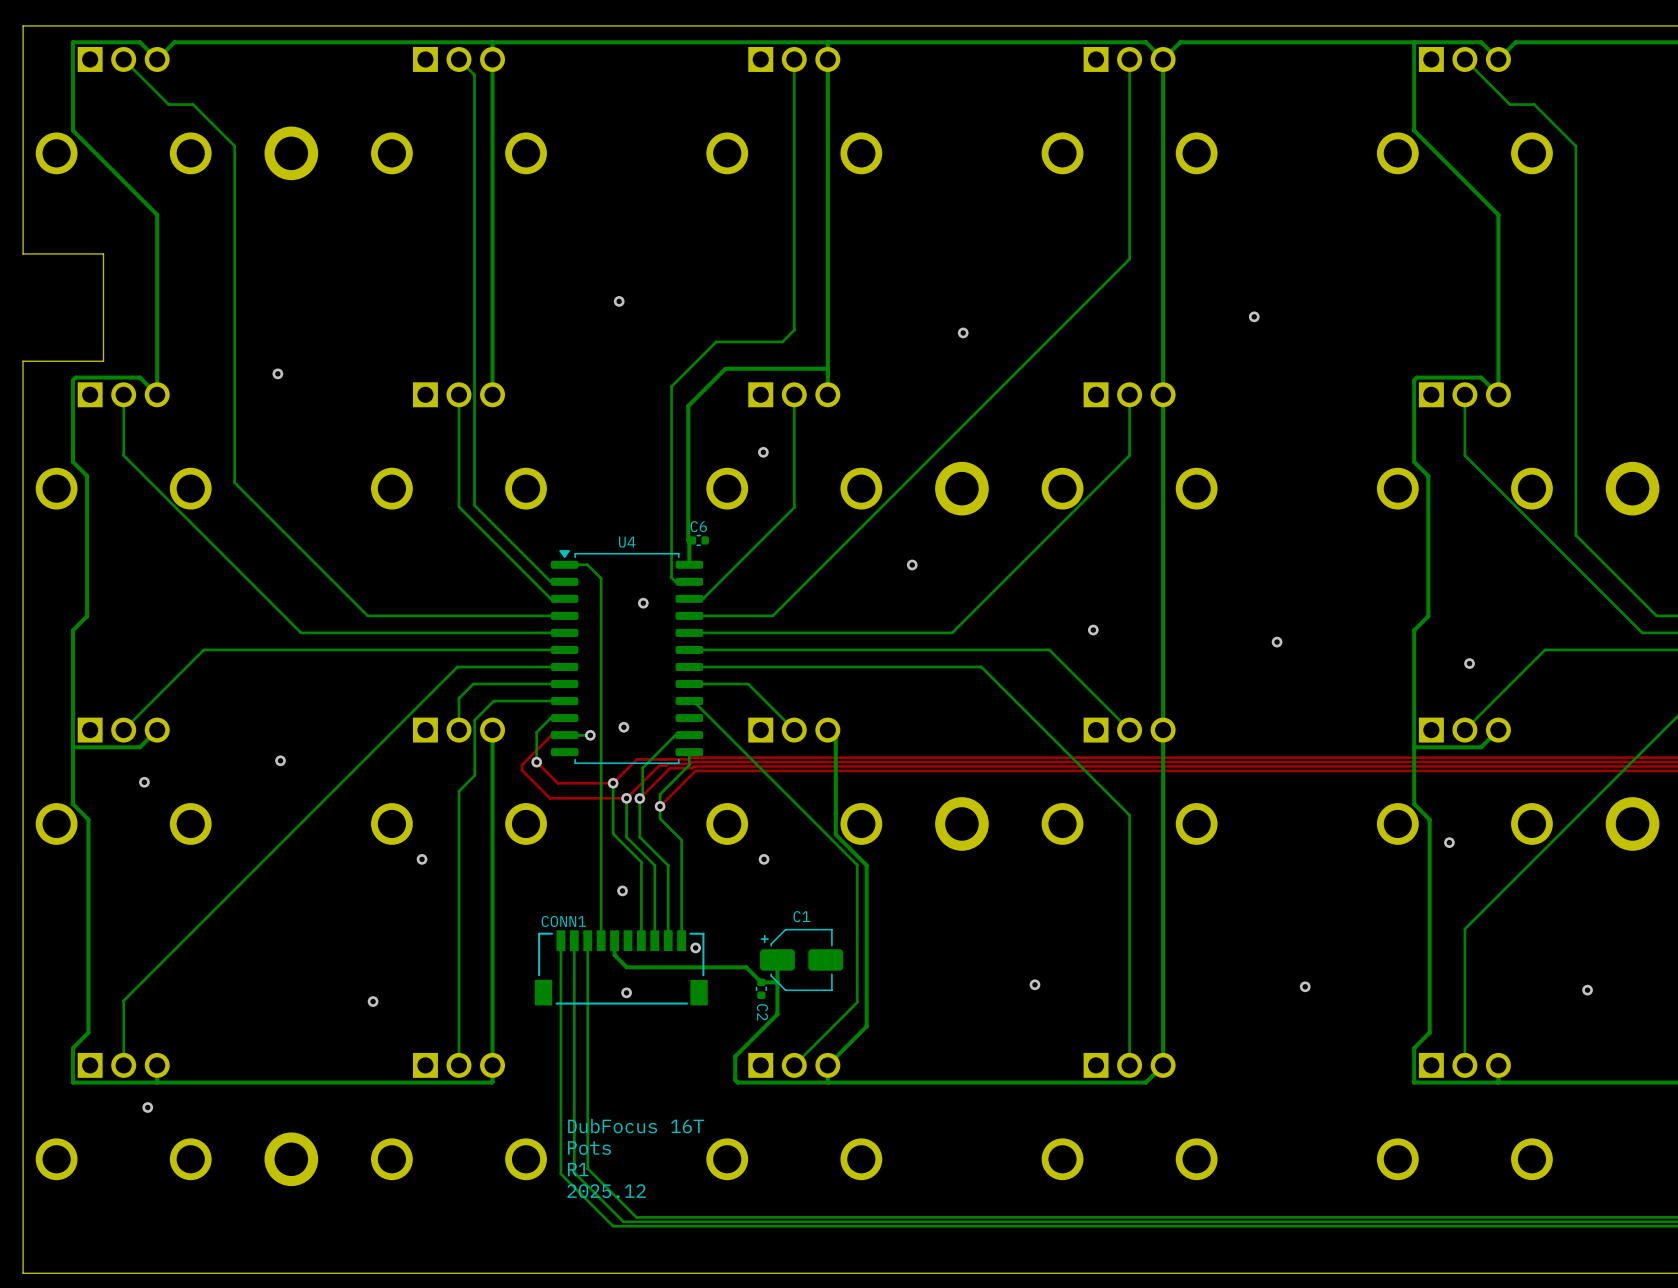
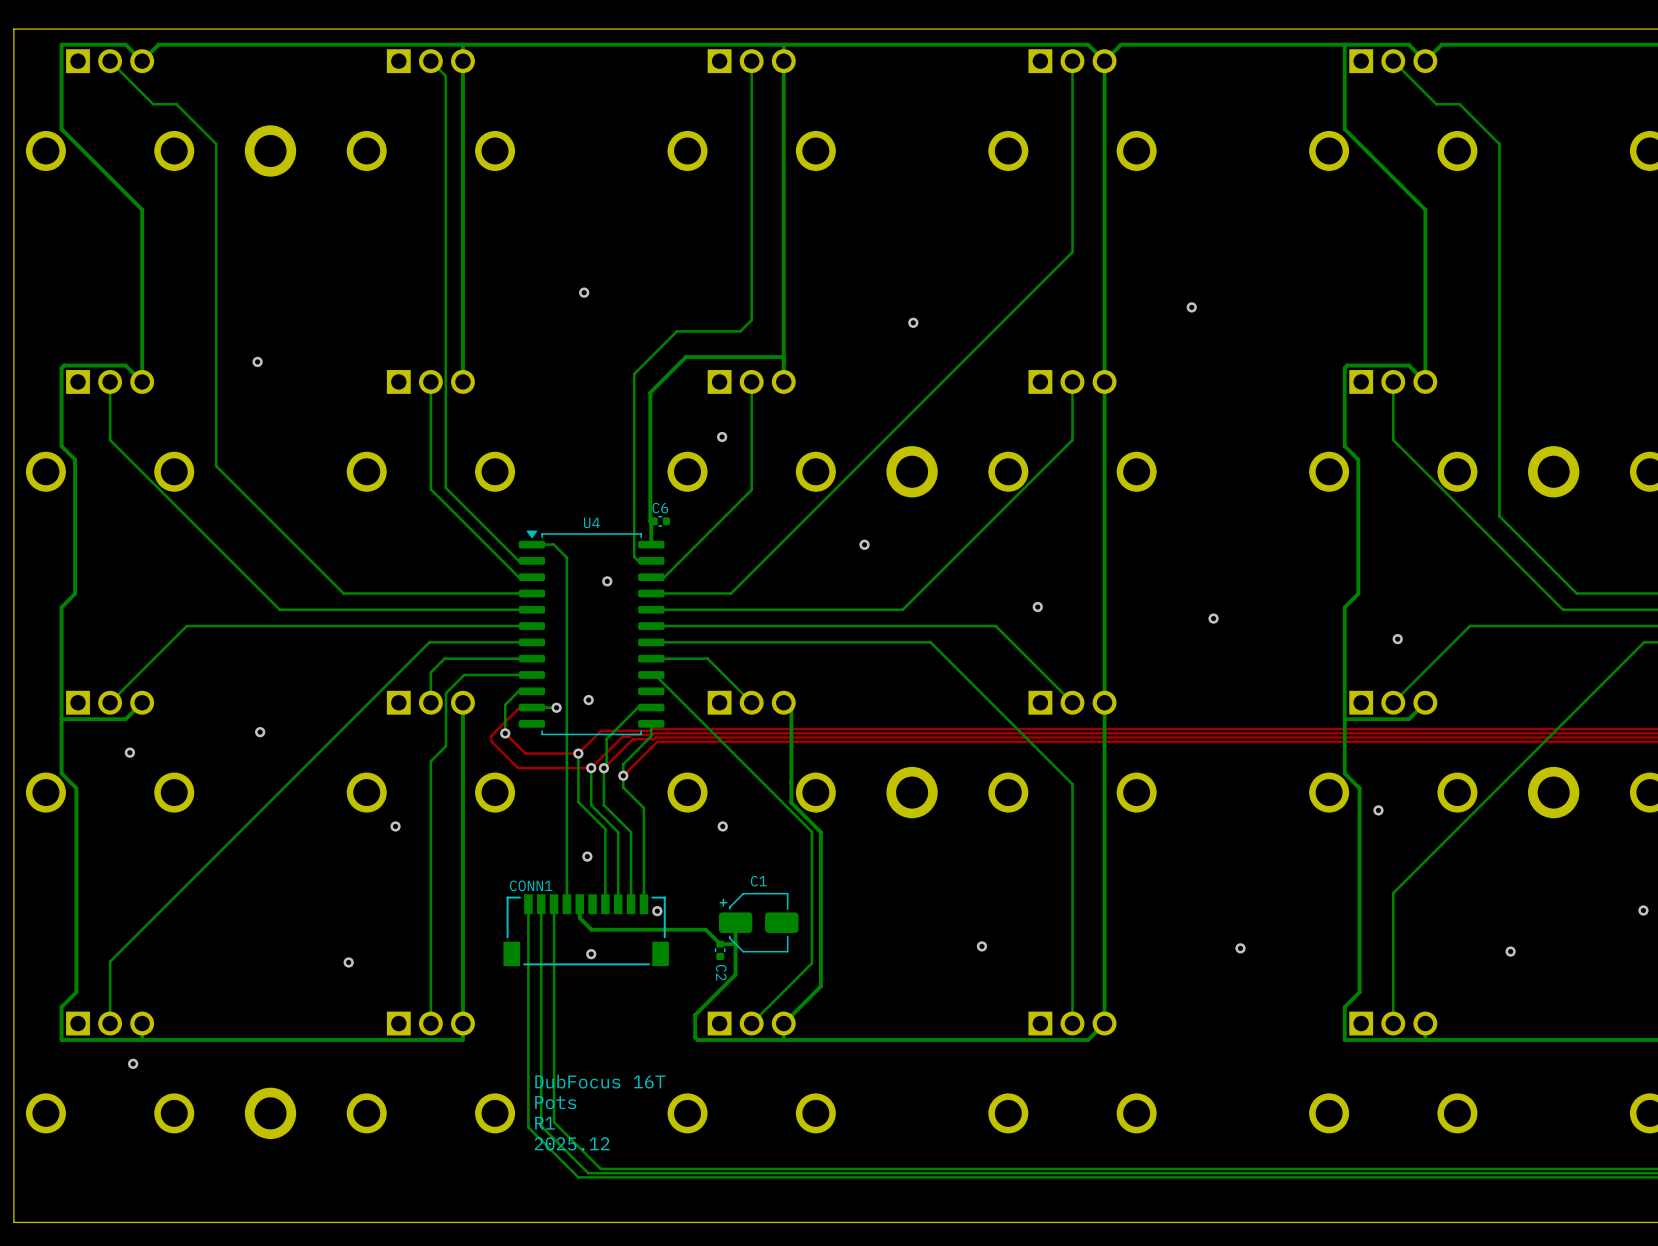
board edge: (23, 253) (103, 253) (103, 361) (23, 361) (23, 1273) -> (13, 247) (13, 1222)

